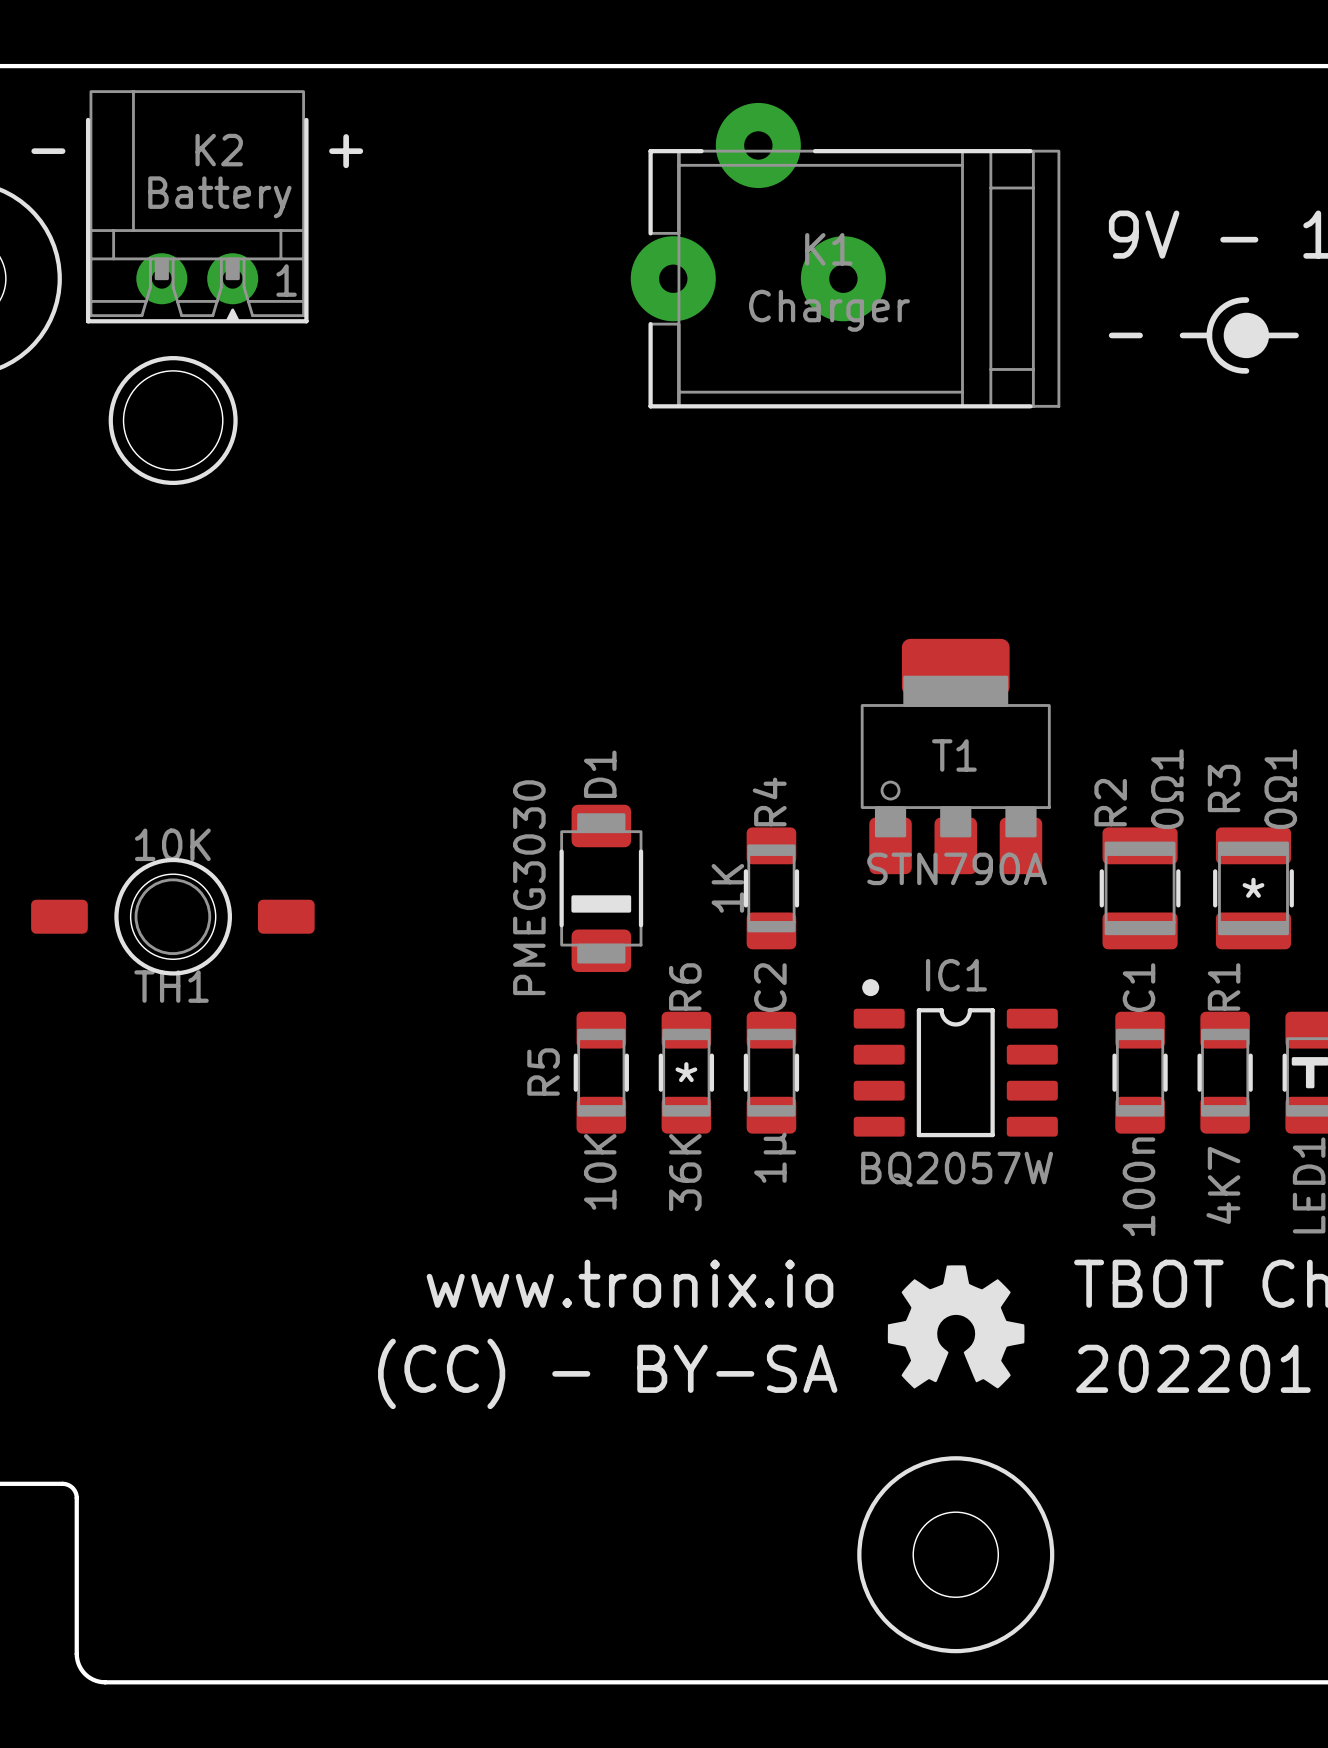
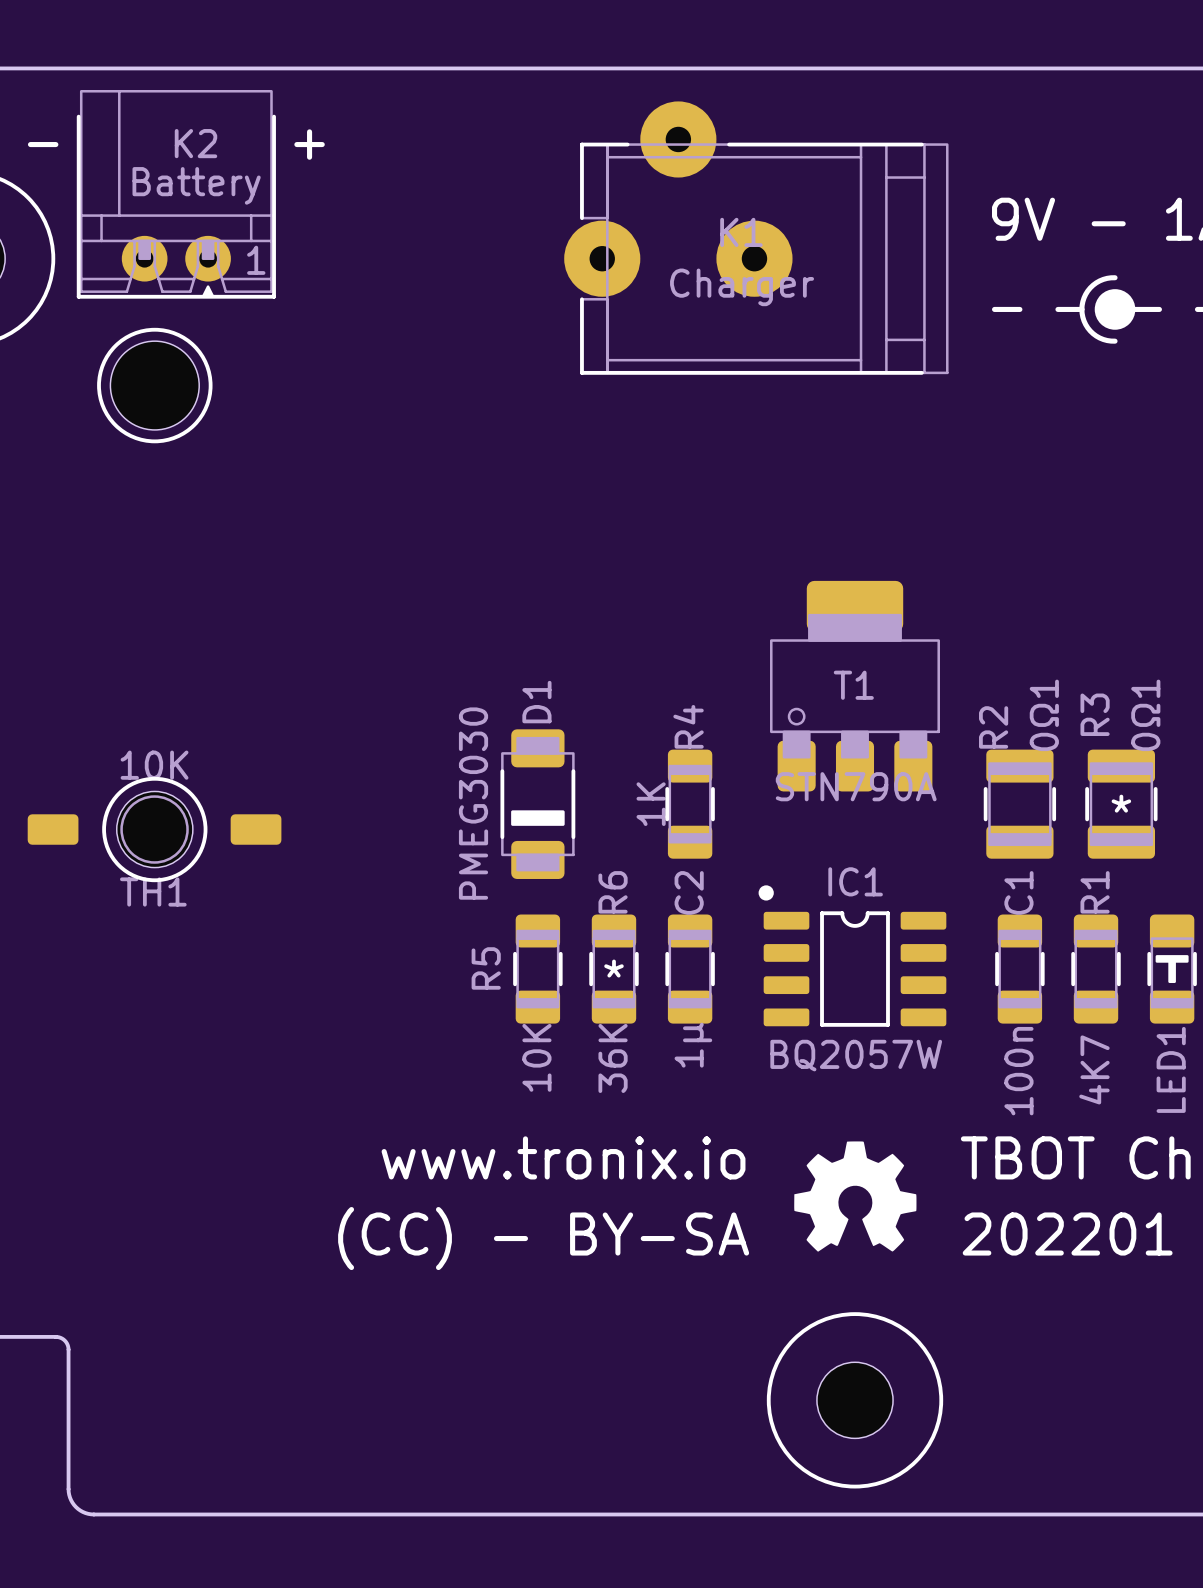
drawing position: (870, 987) -> (766, 892)

